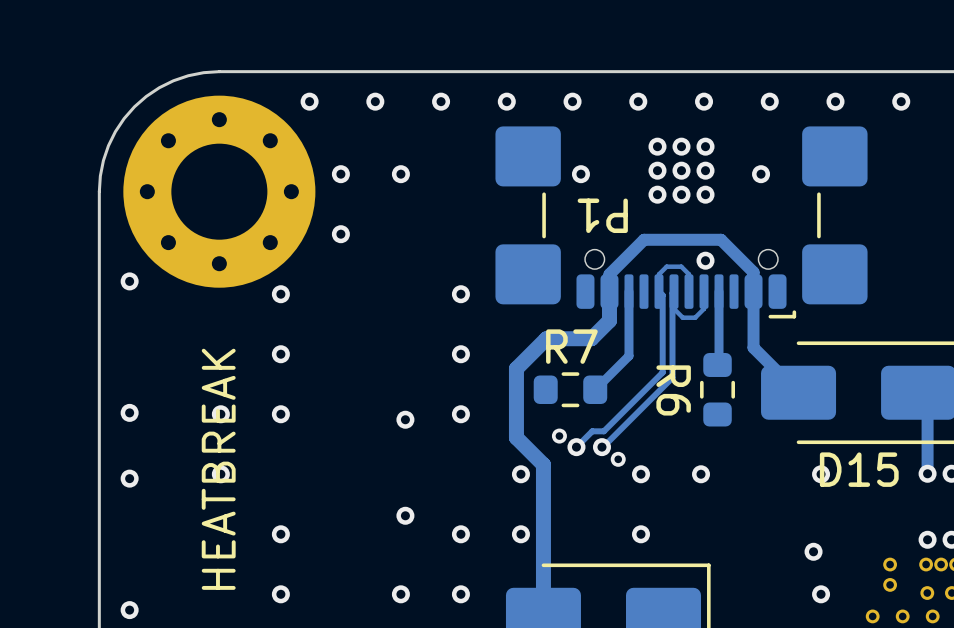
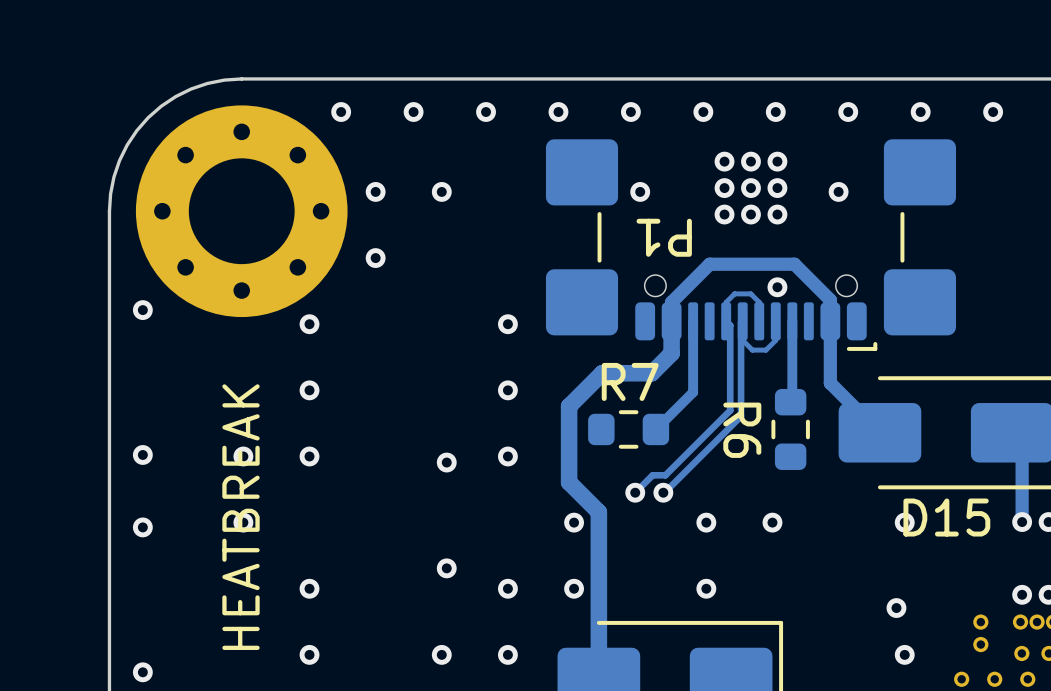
via: (559, 436) -> none
via: (618, 459) -> none

